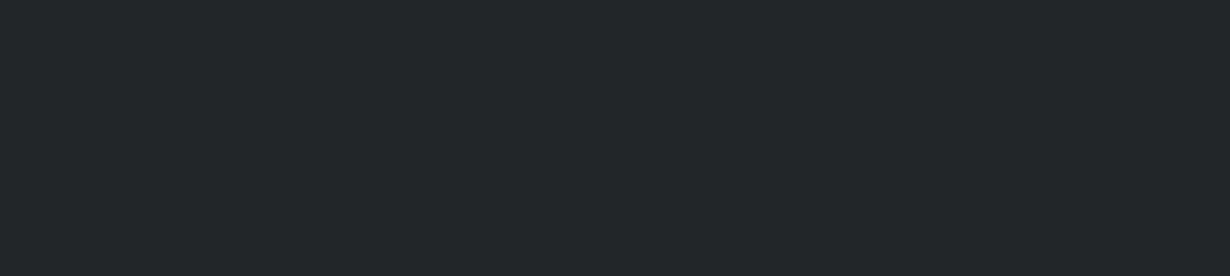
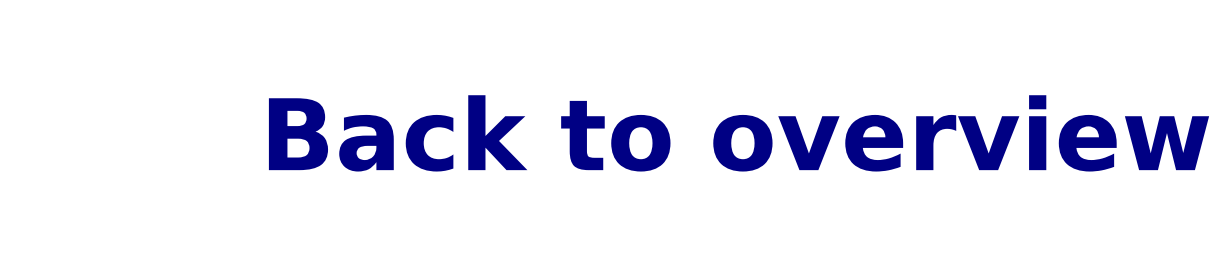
text: none -> Back to overview (739, 133)

